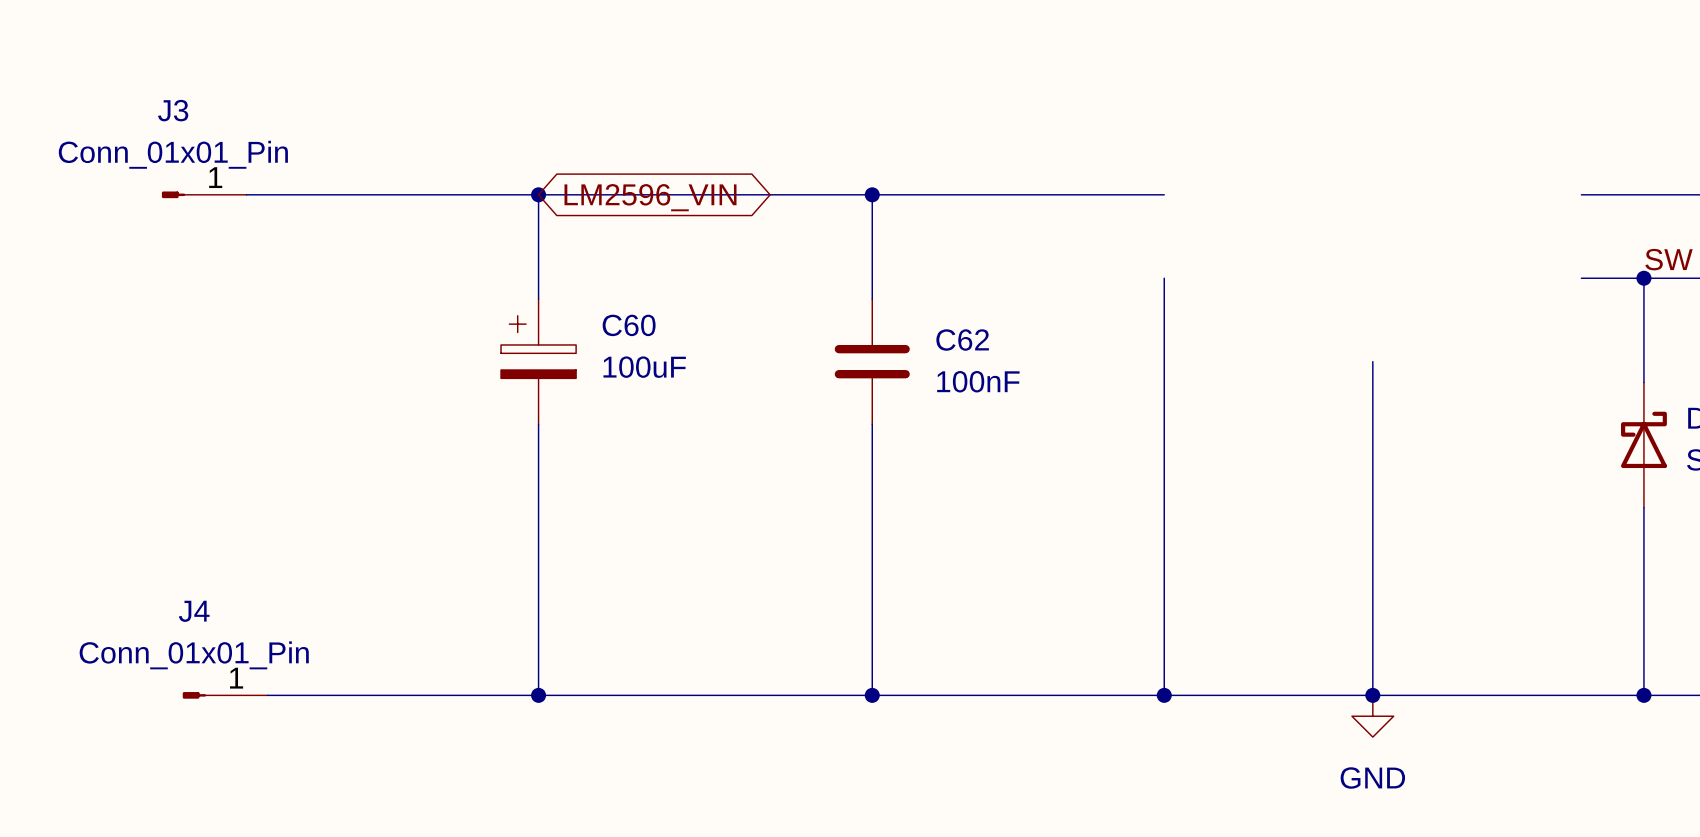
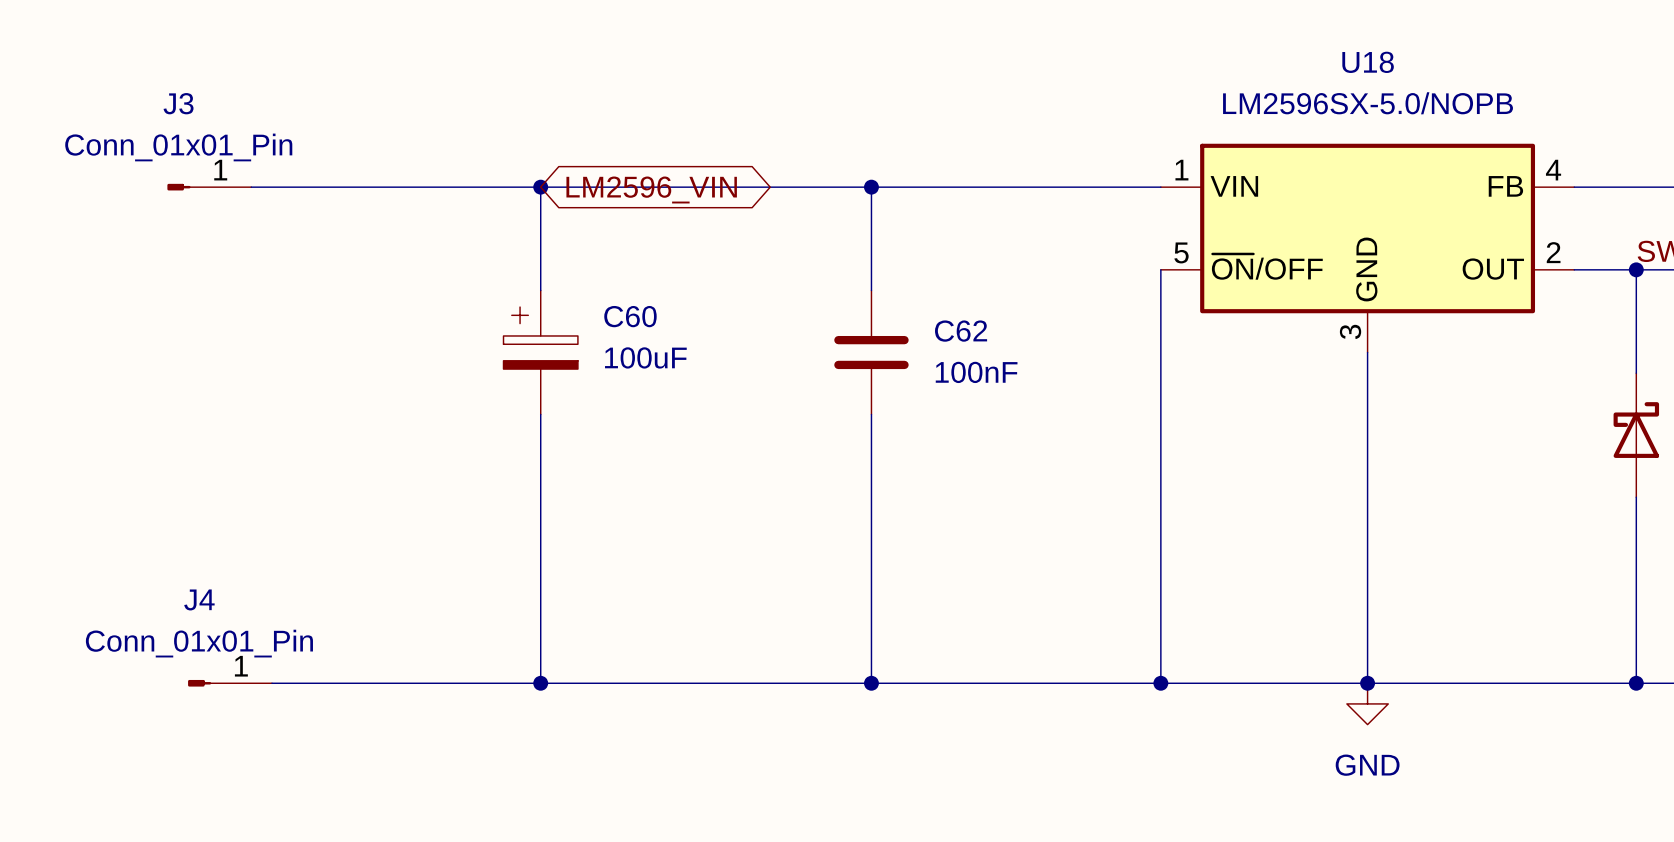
U18: none -> LM2596SX-5.0/NOPB (1367, 248)

